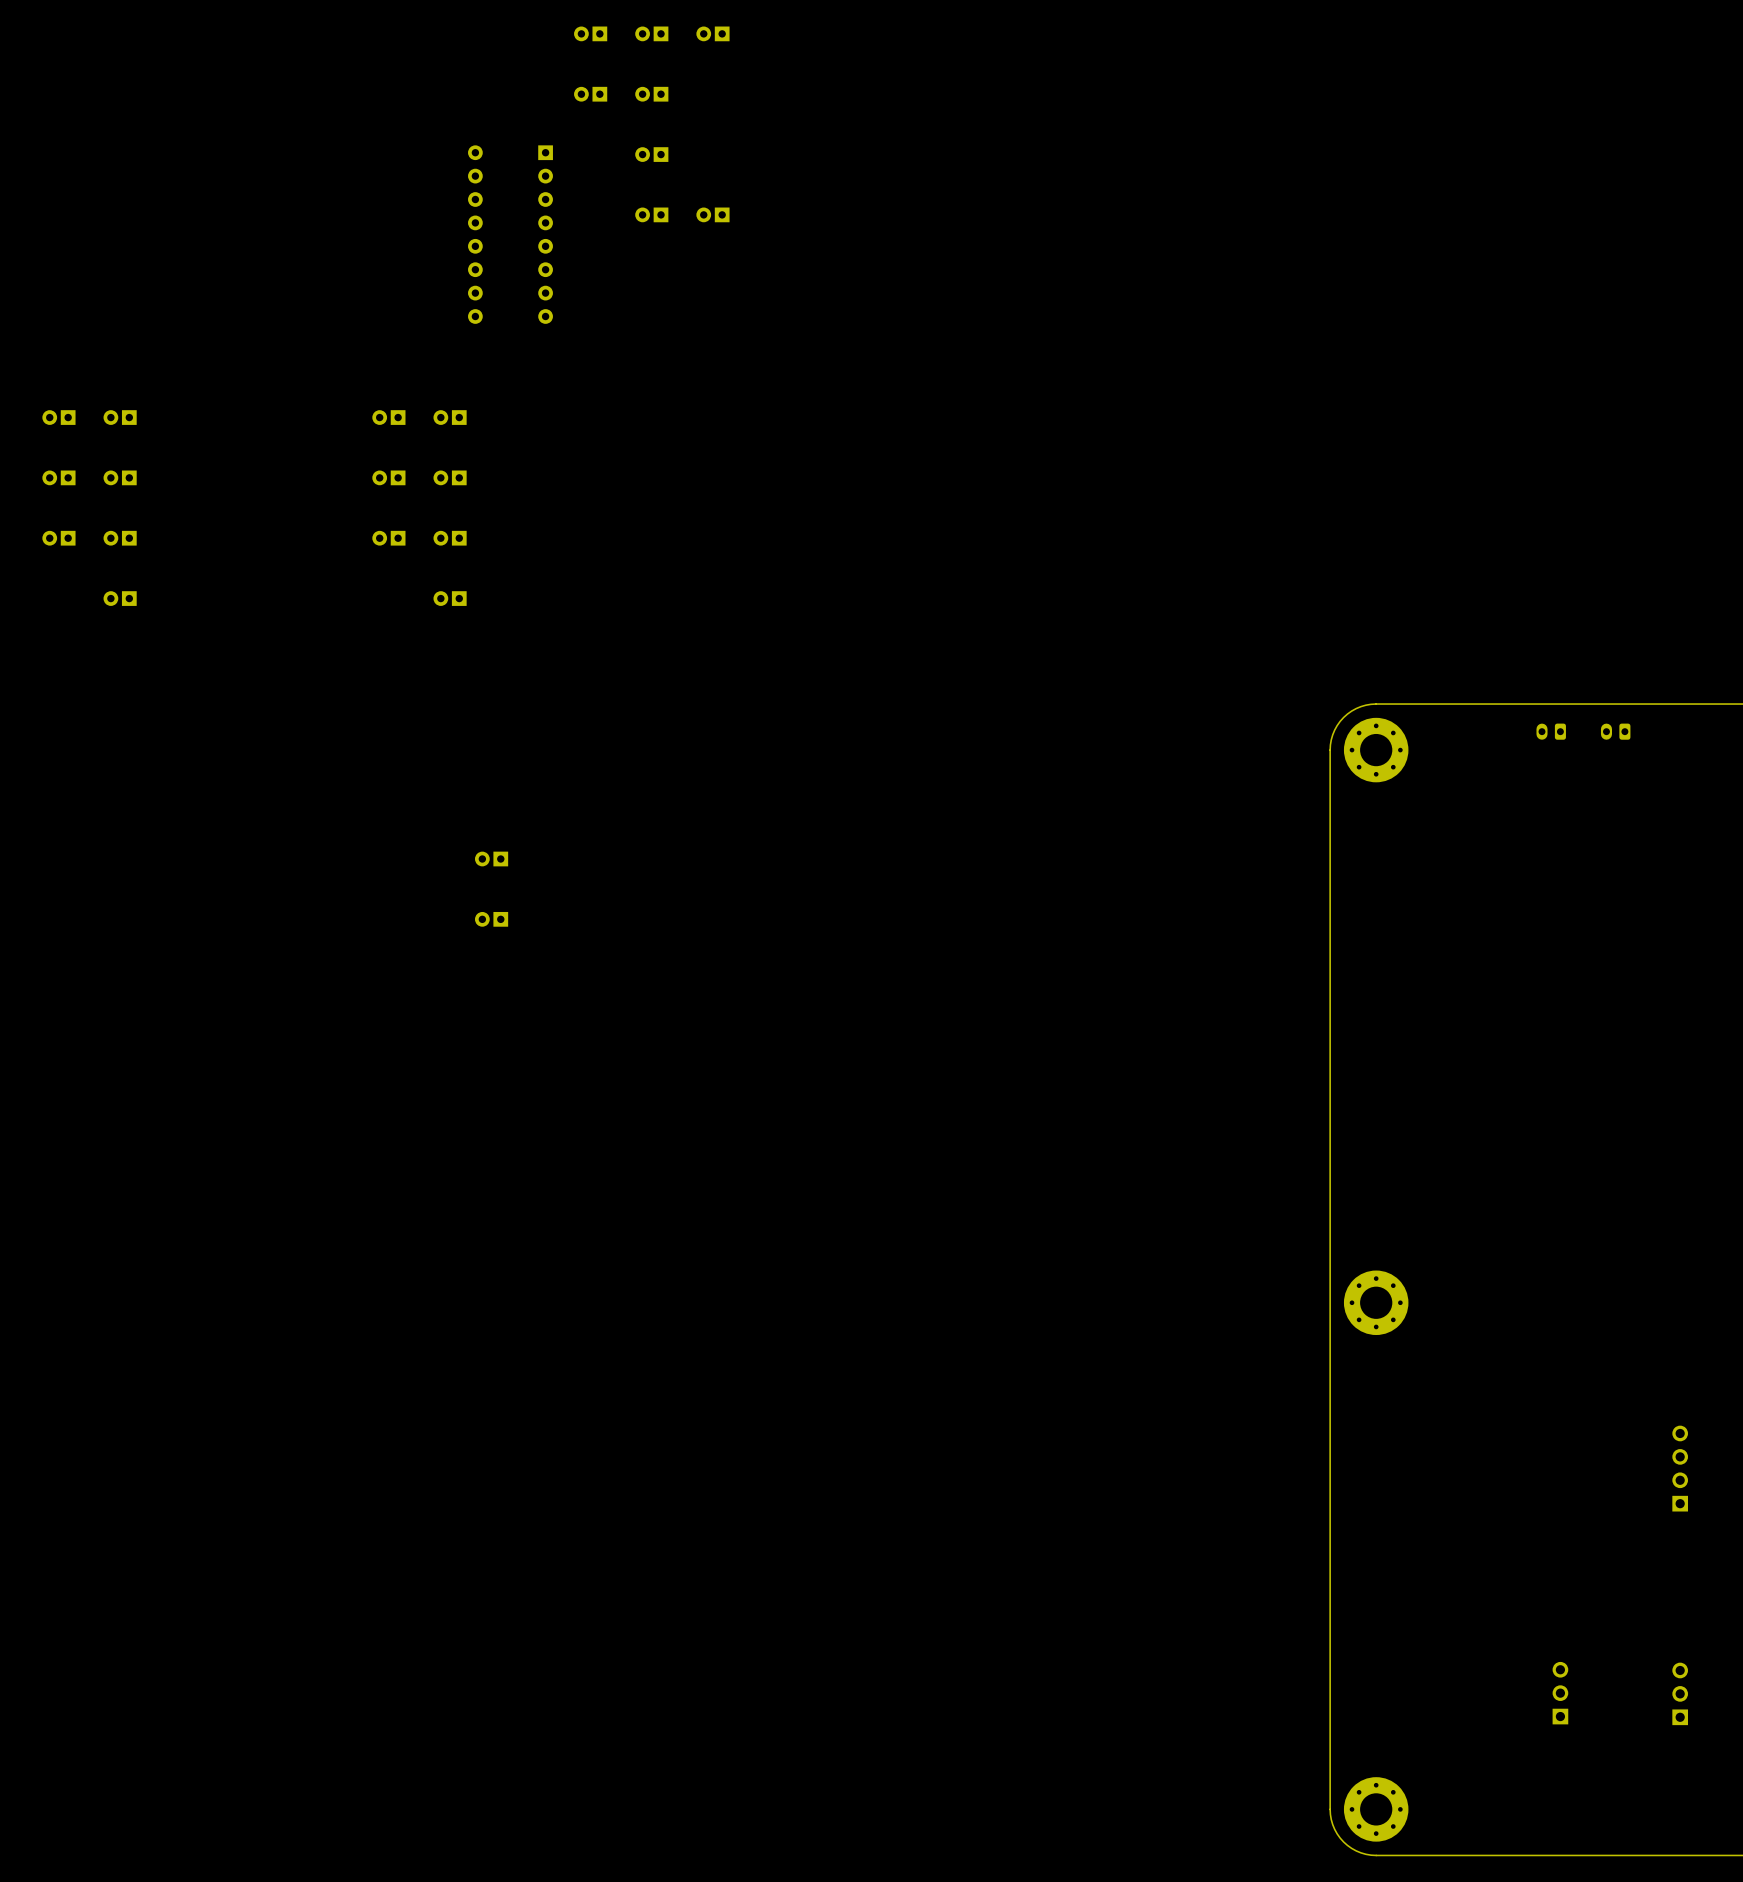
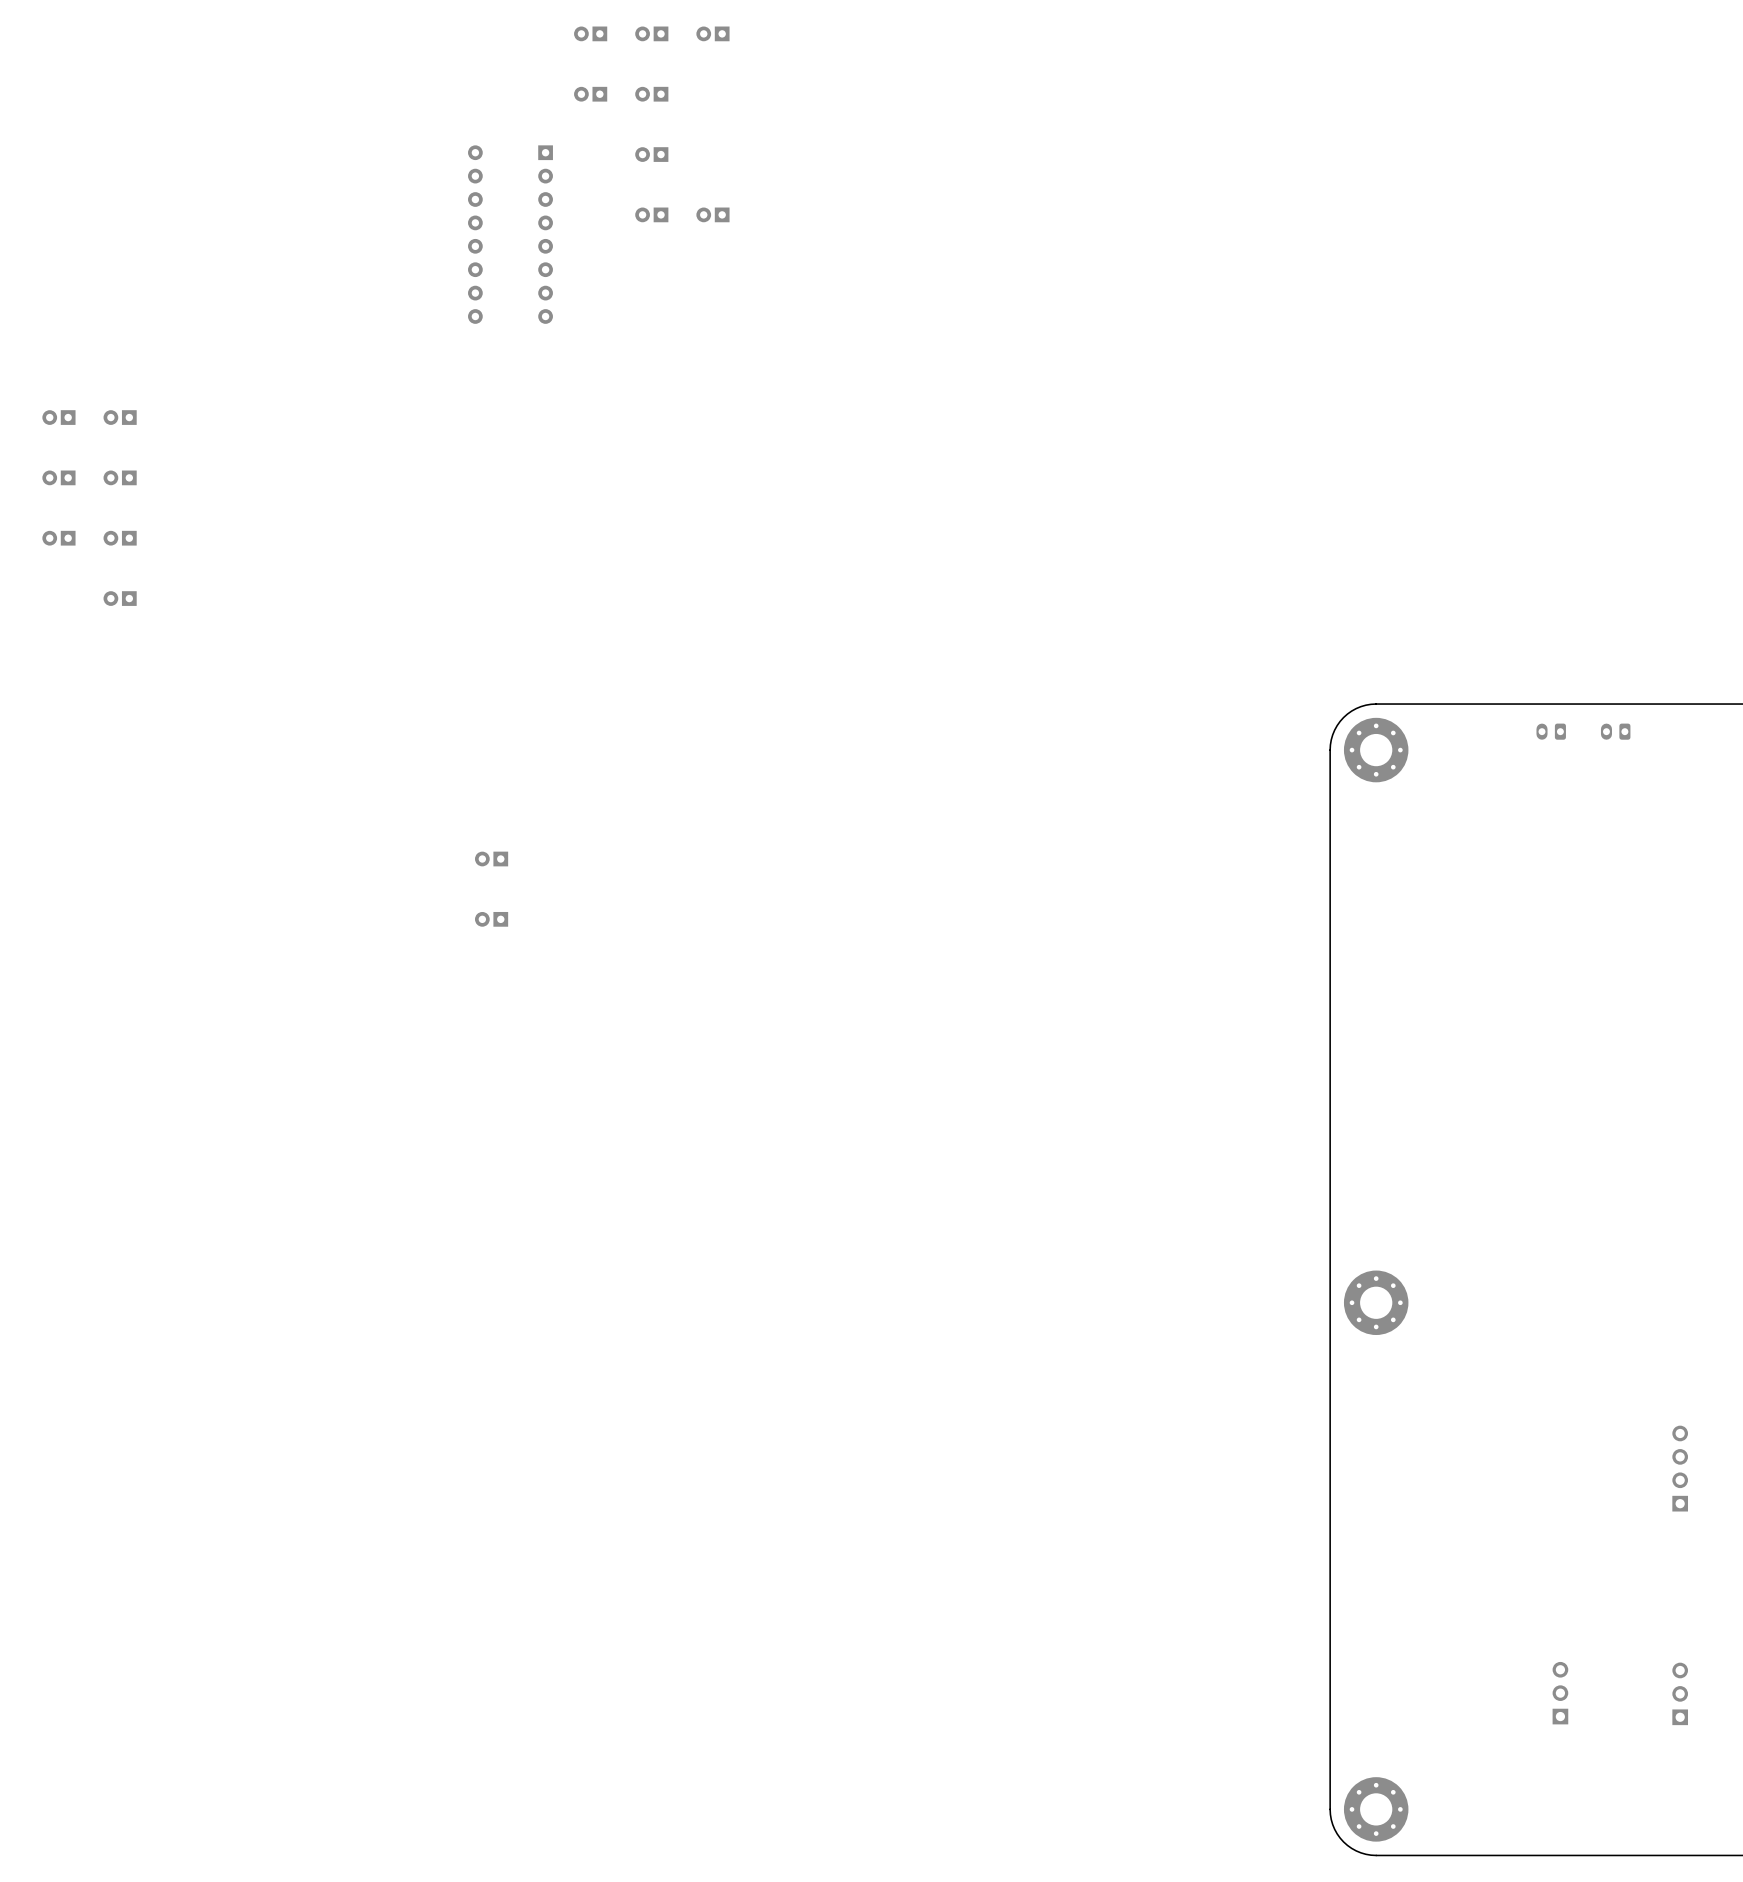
part: (388, 417) -> none
part: (450, 417) -> none
part: (388, 477) -> none
part: (450, 477) -> none
part: (388, 538) -> none
part: (450, 538) -> none
part: (450, 598) -> none

